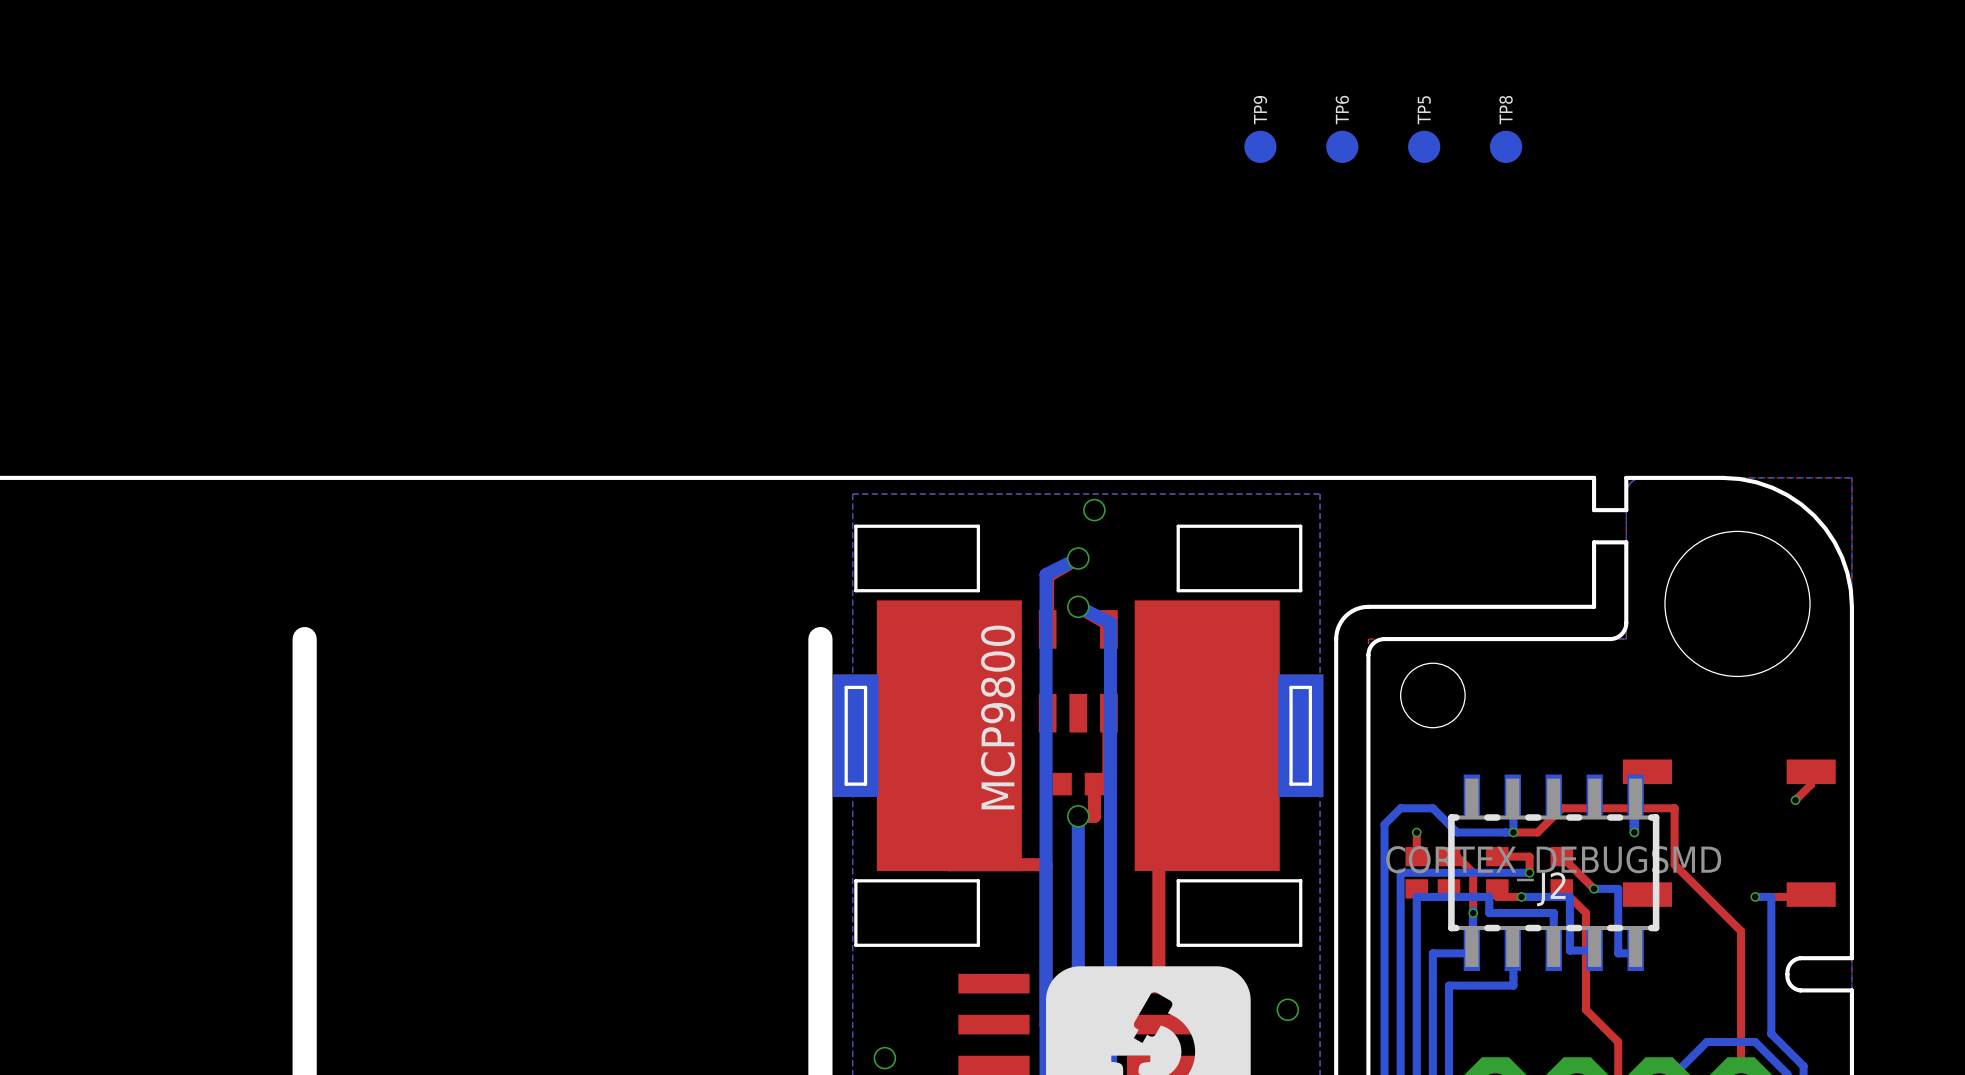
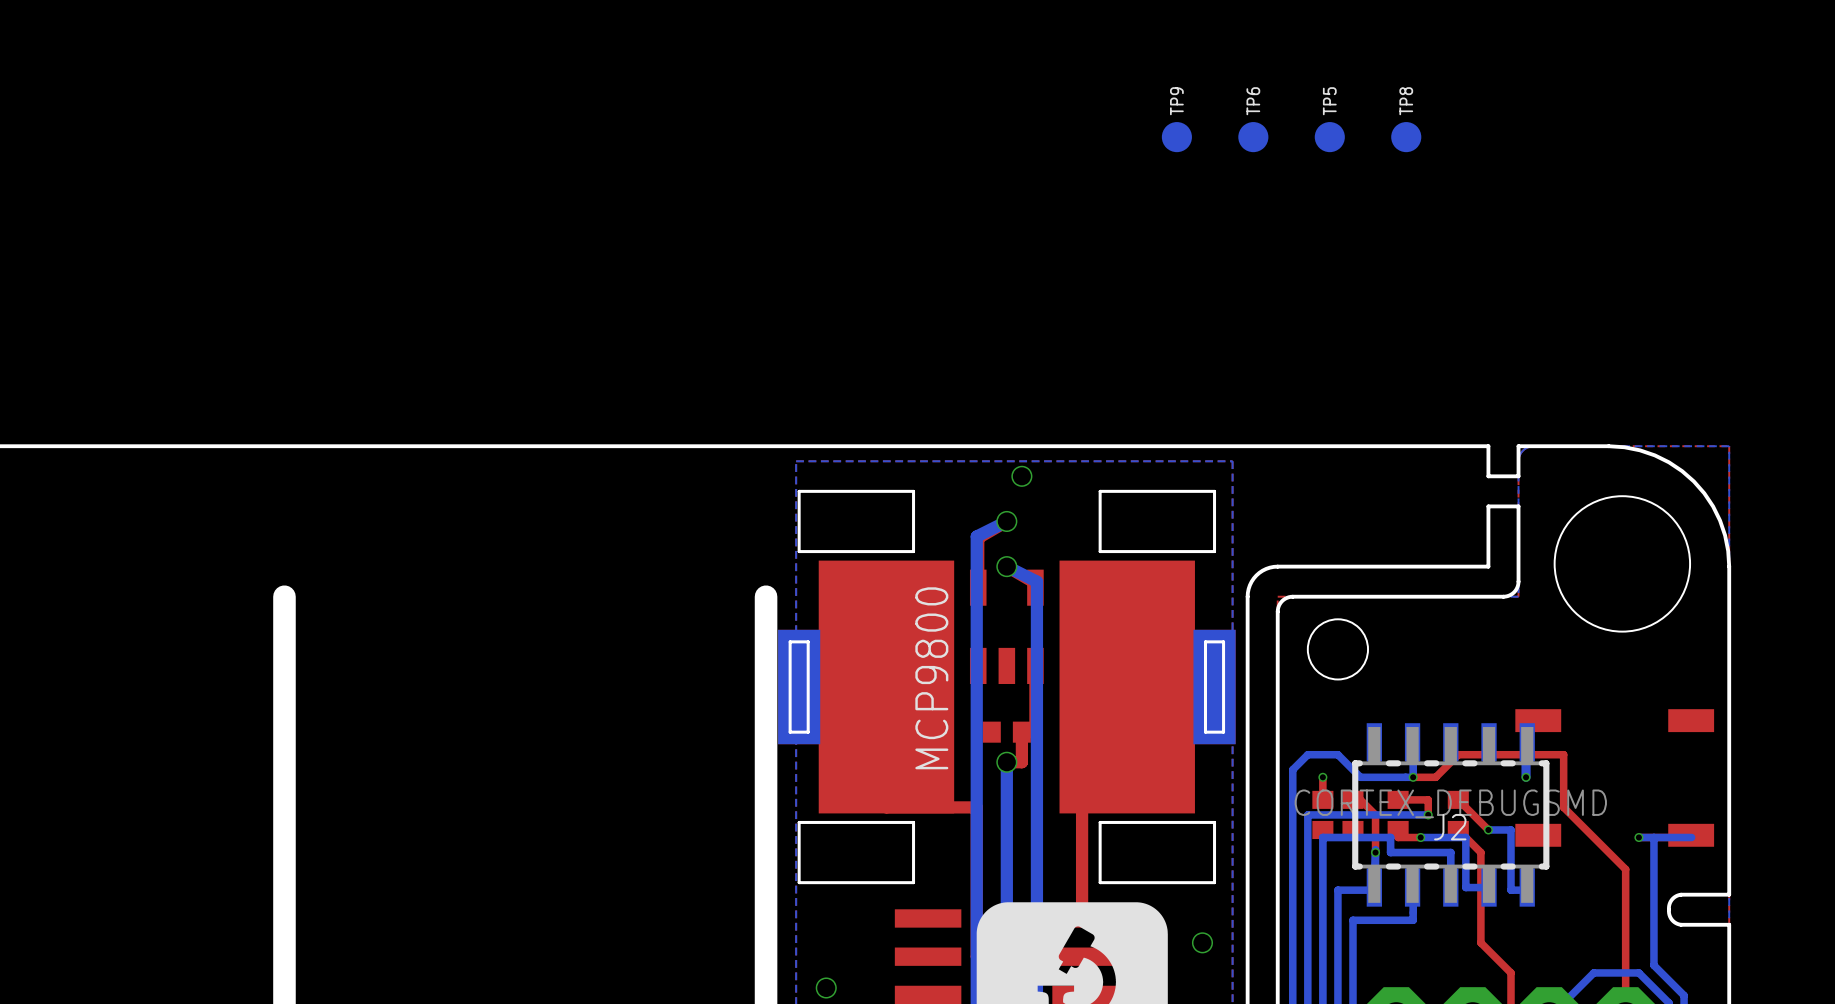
top track: (1811, 771) (1811, 784) (1795, 800) -> none
via: (1795, 800) -> none
bottom track: none -> (1691, 837) (1653, 837)

